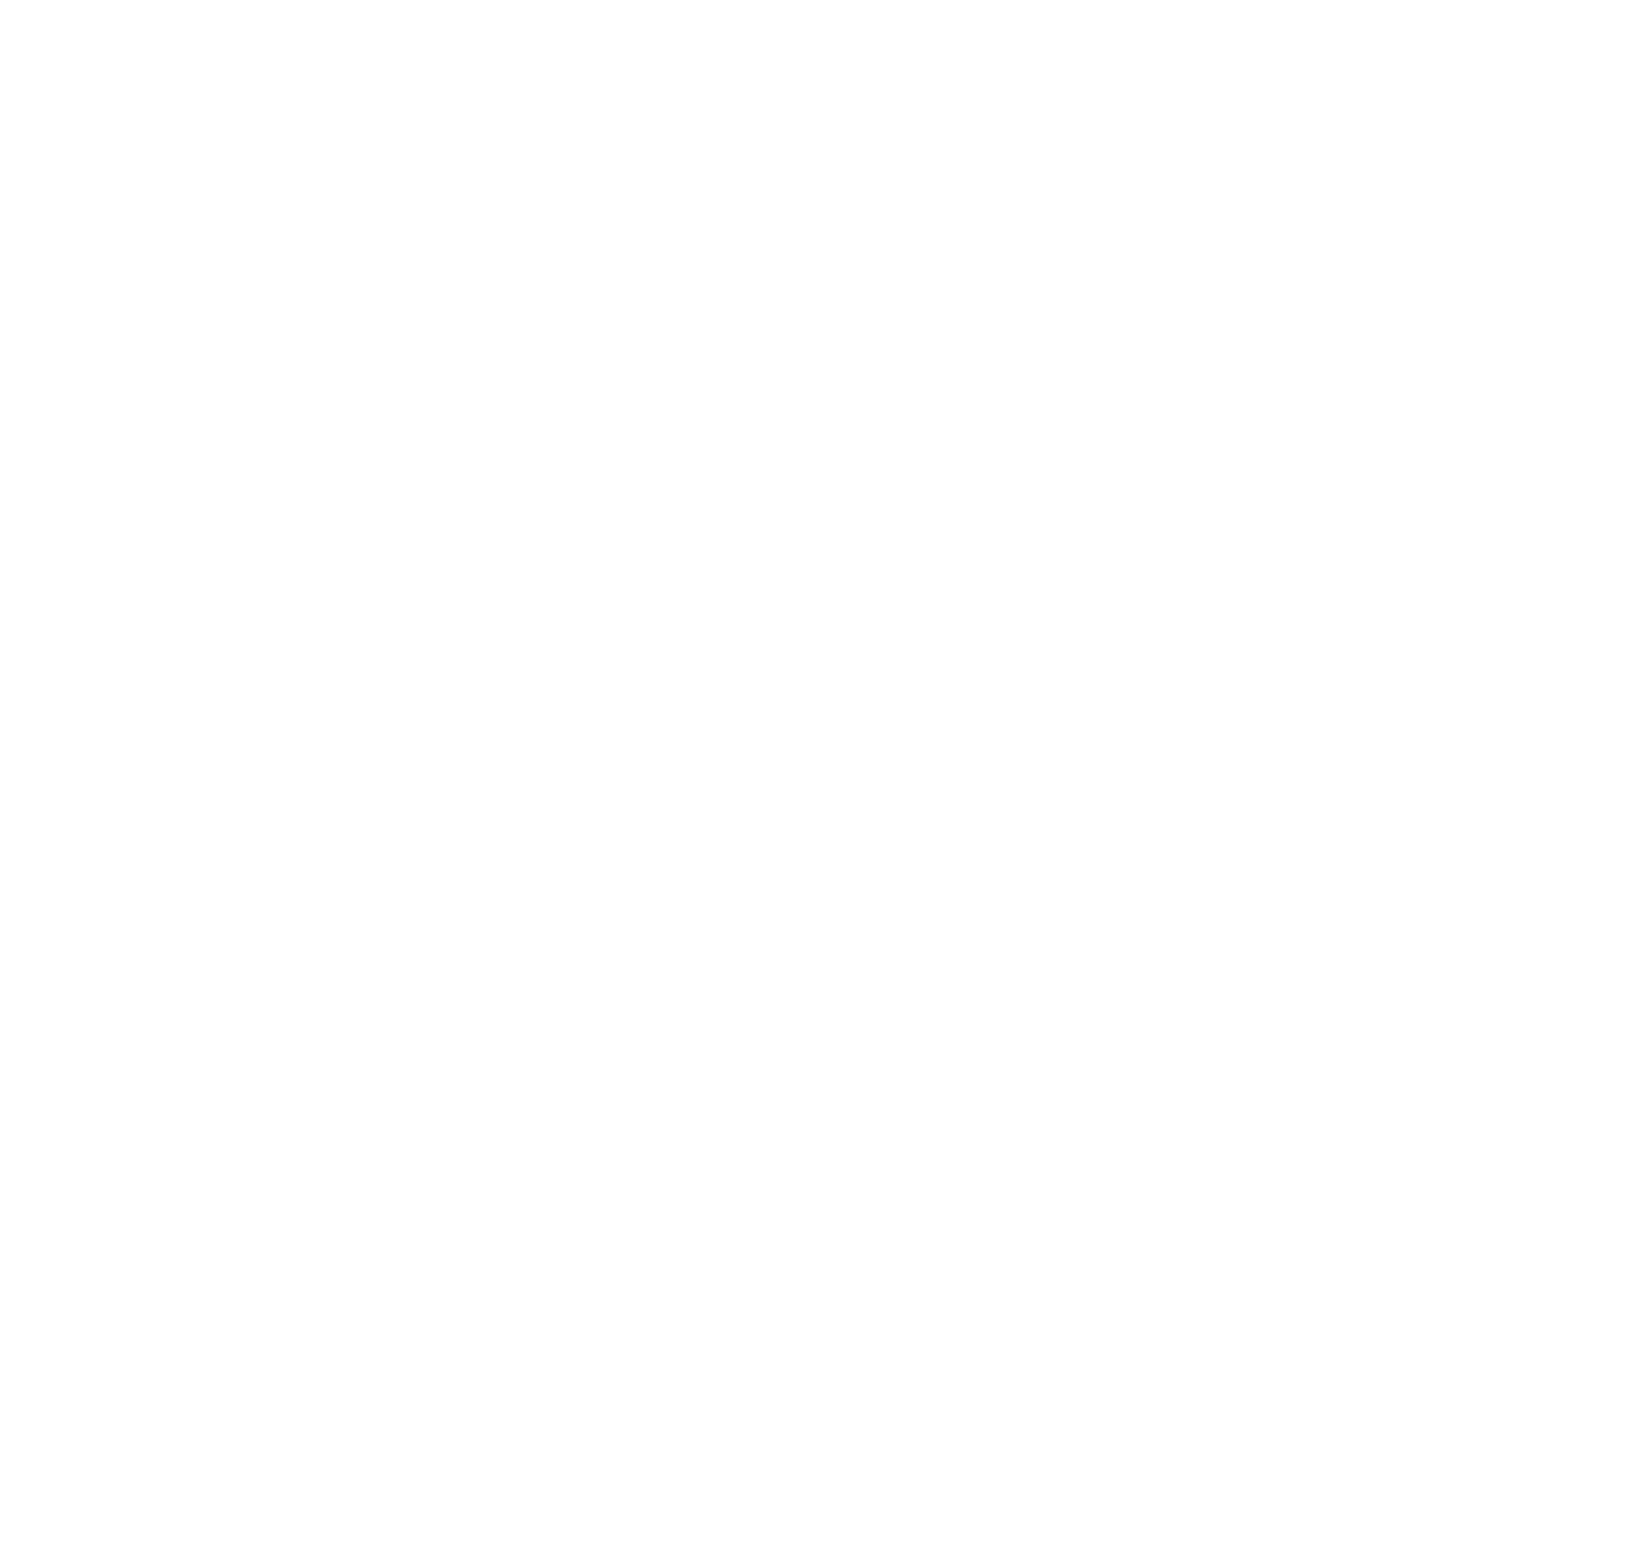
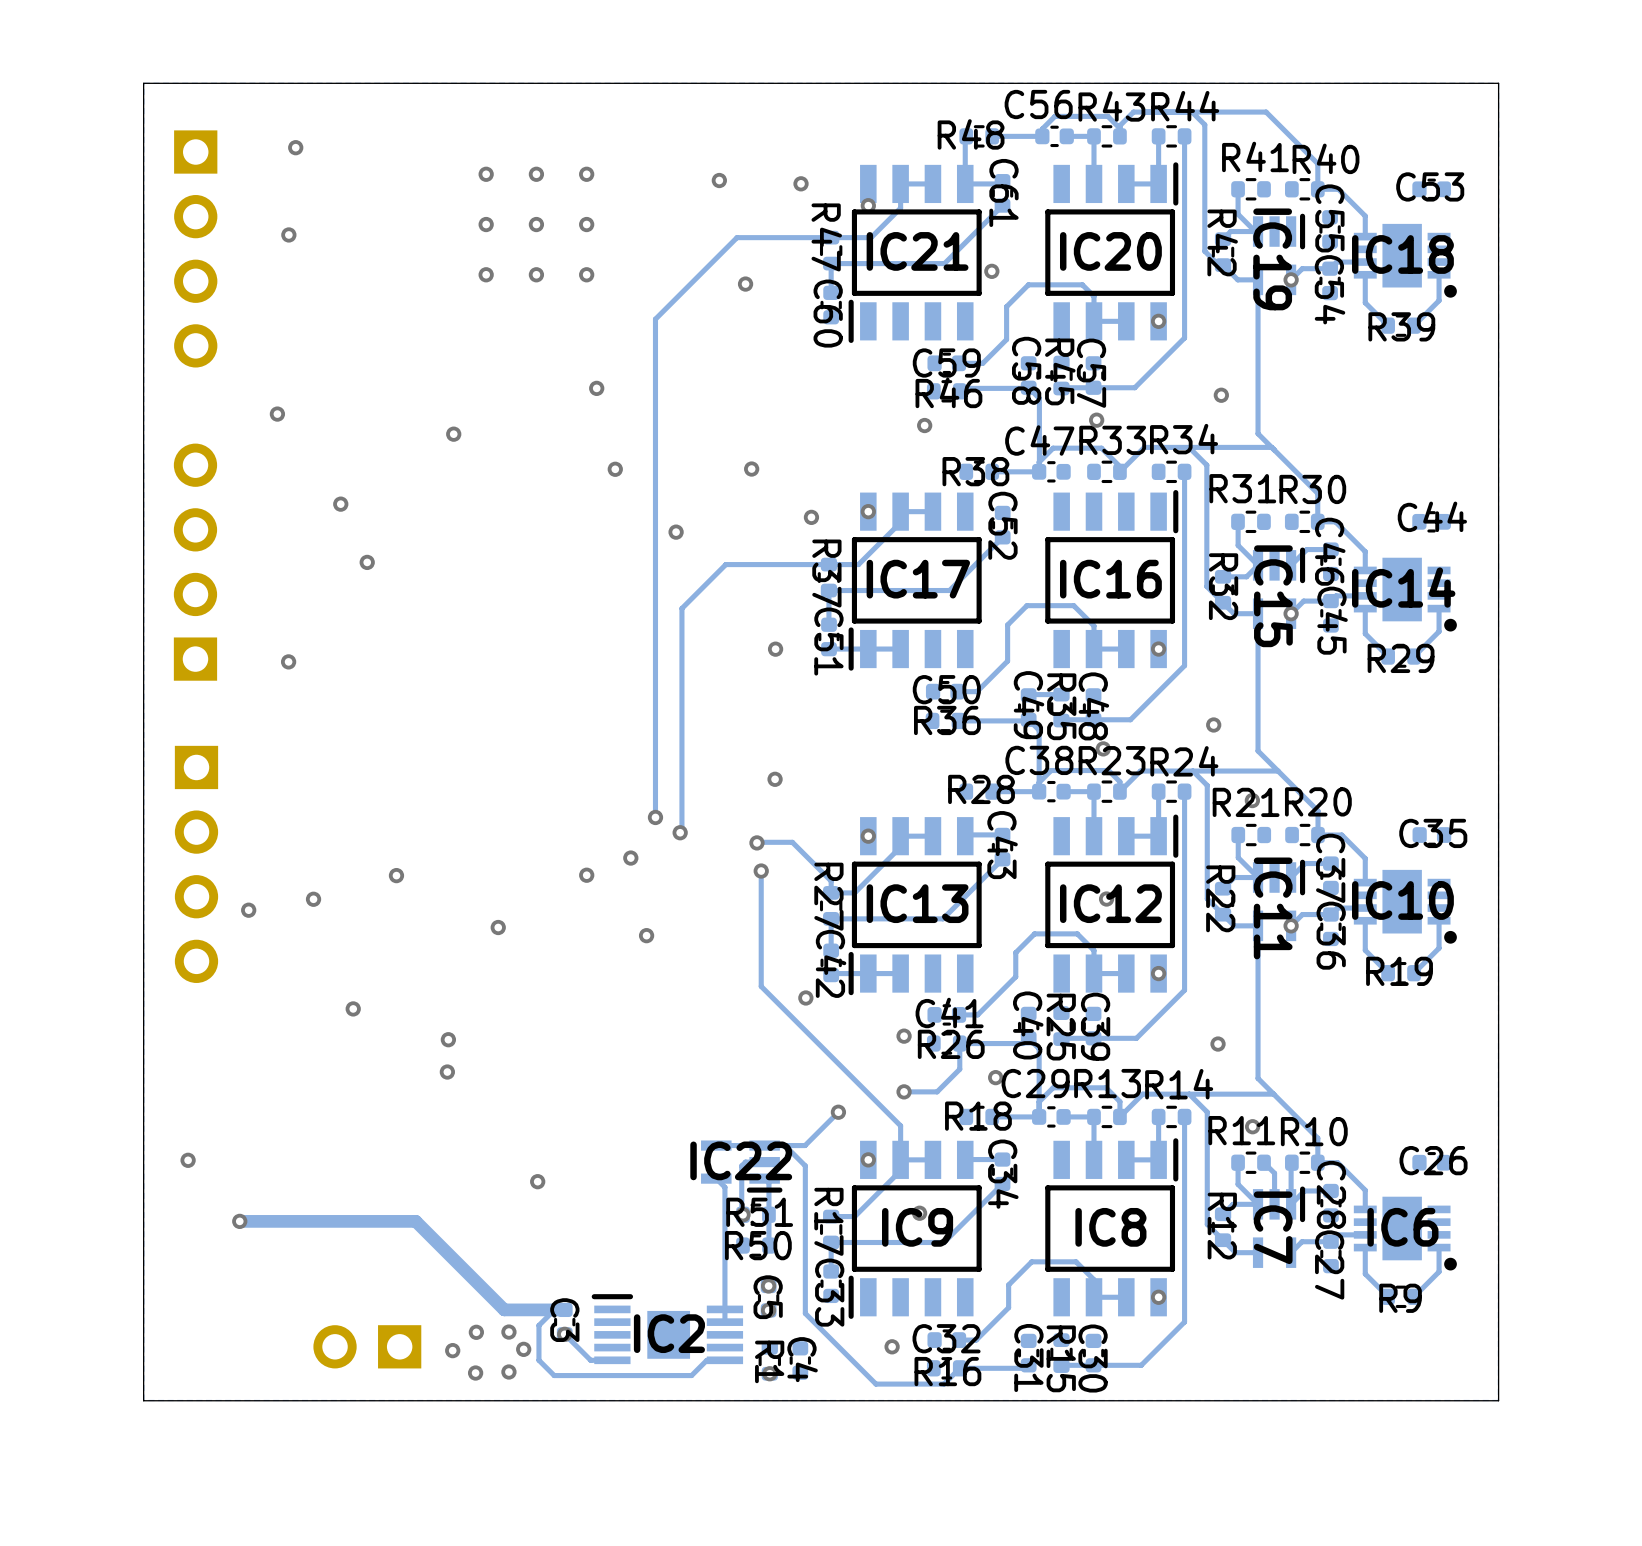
board edge: none -> (1498, 83) (143, 83) (143, 1400) (1498, 1400) (1498, 83)
track: none -> (1192, 112) (1204, 124) (1204, 251) (1237, 279) (1258, 279) (1258, 433) (1317, 493) (1317, 521) (1335, 521) (1365, 551) (1365, 570)
track: none -> (1119, 128) (1107, 116) (1054, 116) (1042, 128) (1042, 136) (992, 136)
track: none -> (966, 136) (965, 183) (999, 183) (1002, 181)
R48: none -> (979, 136)
C56: none -> (1054, 136)
track: none -> (1066, 136) (1093, 136) (1093, 183)
R43: none -> (1106, 136)
track: none -> (1119, 136) (1119, 125) (1133, 112) (1266, 112) (1317, 163) (1317, 189) (1338, 189) (1365, 216) (1365, 236)
track: none -> (1158, 136) (1158, 183) (1126, 183)
R44: none -> (1171, 136)
track: none -> (1184, 136) (1184, 338) (1134, 387) (1061, 388)
via: none -> (295, 147)
via: none -> (486, 174)
via: none -> (536, 174)
via: none -> (586, 174)
via: none -> (719, 180)
via: none -> (801, 183)
track: none -> (932, 183) (900, 183) (900, 208) (871, 237) (737, 237) (655, 319) (655, 817)
track: none -> (1238, 189) (1238, 214) (1255, 231)
R41: none -> (1251, 189)
R40: none -> (1304, 189)
C53: none -> (1431, 189)
C61: none -> (1002, 193)
via: none -> (868, 205)
track: none -> (1002, 205) (944, 263) (831, 263) (831, 292)
via: none -> (486, 224)
via: none -> (536, 224)
via: none -> (586, 224)
C55: none -> (1330, 229)
track: none -> (1258, 231) (1230, 231) (1223, 239)
via: none -> (288, 234)
part: none -> (195, 248)
R47: none -> (831, 250)
IC20: none -> (1111, 251)
R42: none -> (1223, 252)
IC21: none -> (915, 253)
IC19: none -> (1279, 254)
IC18: none -> (1405, 260)
track: none -> (1365, 262) (1336, 262) (1330, 268) (1302, 268) (1291, 279)
via: none -> (991, 271)
via: none -> (486, 274)
via: none -> (536, 274)
via: none -> (586, 274)
track: none -> (1365, 274) (1365, 302) (1388, 325)
track: none -> (1439, 274) (1439, 300) (1414, 325)
via: none -> (1291, 279)
C54: none -> (1330, 280)
via: none -> (745, 284)
C60: none -> (831, 305)
track: none -> (1126, 321) (1093, 321) (1093, 296) (1082, 284) (1028, 284) (1006, 306) (1006, 339) (982, 363) (959, 363)
via: none -> (1158, 321)
R39: none -> (1401, 325)
C59: none -> (946, 363)
C58: none -> (1028, 375)
R45: none -> (1061, 375)
C57: none -> (1093, 375)
via: none -> (596, 388)
R46: none -> (946, 391)
track: none -> (959, 391) (962, 388) (1028, 387) (1039, 398) (1039, 471)
via: none -> (1221, 395)
via: none -> (277, 414)
via: none -> (1096, 420)
via: none -> (924, 425)
via: none -> (453, 434)
track: none -> (1189, 447) (1206, 465) (1206, 586) (1233, 613) (1258, 613) (1258, 751) (1318, 810) (1318, 835) (1341, 835) (1365, 858) (1365, 882)
track: none -> (1271, 447) (1144, 447) (1119, 471) (1119, 466) (1101, 448) (1053, 448) (1039, 462) (1039, 471) (992, 471)
via: none -> (615, 469)
via: none -> (751, 469)
R38: none -> (979, 471)
C47: none -> (1051, 471)
R33: none -> (1106, 471)
R34: none -> (1171, 471)
track: none -> (1184, 471) (1184, 665) (1130, 719) (1061, 720)
via: none -> (340, 504)
via: none -> (868, 511)
track: none -> (932, 511) (900, 511) (900, 522) (858, 564) (725, 564) (681, 608) (681, 830) (680, 832)
via: none -> (811, 517)
track: none -> (1238, 521) (1238, 545) (1258, 565) (1246, 576) (1223, 576)
R31: none -> (1250, 521)
R30: none -> (1304, 521)
C44: none -> (1431, 521)
C52: none -> (1002, 525)
via: none -> (676, 532)
track: none -> (1002, 537) (949, 590) (828, 590) (829, 624)
track: none -> (1330, 549) (1306, 549) (1291, 565)
C46: none -> (1330, 561)
part: none -> (195, 562)
via: none -> (367, 562)
R37: none -> (828, 577)
IC16: none -> (1111, 579)
IC17: none -> (915, 581)
IC15: none -> (1279, 588)
R32: none -> (1223, 589)
IC14: none -> (1405, 594)
track: none -> (1365, 595) (1336, 595) (1330, 601) (1303, 601) (1291, 613)
track: none -> (1365, 608) (1365, 633) (1388, 656)
track: none -> (1439, 608) (1439, 631) (1414, 656)
via: none -> (1291, 613)
C45: none -> (1330, 613)
C51: none -> (829, 636)
via: none -> (775, 649)
track: none -> (900, 649) (829, 649)
track: none -> (1126, 649) (1093, 649) (1093, 625) (1073, 605) (1026, 605) (1007, 625) (1007, 661) (977, 691) (957, 691)
via: none -> (1158, 649)
R29: none -> (1401, 656)
via: none -> (288, 661)
C50: none -> (945, 691)
track: none -> (1061, 694) (1028, 695)
C49: none -> (1028, 707)
R35: none -> (1061, 707)
C48: none -> (1093, 707)
R36: none -> (945, 720)
track: none -> (958, 720) (1028, 719) (1039, 730) (1039, 791) (992, 791)
via: none -> (1213, 724)
via: none -> (1103, 748)
track: none -> (1192, 771) (1207, 785) (1207, 898) (1234, 925) (1258, 925) (1258, 1078) (1317, 1138) (1317, 1162) (1337, 1162) (1365, 1190) (1365, 1209)
track: none -> (1278, 771) (1140, 771) (1119, 791) (1119, 781) (1108, 770) (1051, 770) (1039, 782)
via: none -> (775, 779)
R28: none -> (979, 791)
C38: none -> (1051, 791)
track: none -> (1063, 791) (1093, 791) (1093, 836)
R23: none -> (1106, 791)
track: none -> (1158, 791) (1158, 836) (1126, 836)
R24: none -> (1171, 791)
track: none -> (1184, 791) (1184, 990) (1136, 1038) (1061, 1039)
via: none -> (1252, 800)
via: none -> (655, 817)
via: none -> (680, 832)
track: none -> (1002, 834) (965, 836)
track: none -> (1238, 835) (1238, 857) (1258, 877) (1234, 877) (1223, 888)
R21: none -> (1251, 835)
R20: none -> (1305, 835)
C35: none -> (1431, 835)
via: none -> (868, 836)
track: none -> (932, 836) (900, 836) (900, 846) (854, 892) (831, 892) (831, 881) (792, 842) (756, 842)
via: none -> (756, 842)
C43: none -> (1002, 847)
via: none -> (630, 858)
track: none -> (1002, 859) (942, 918) (831, 918) (831, 950)
track: none -> (1330, 863) (1305, 863) (1291, 877)
part: none -> (196, 864)
track: none -> (761, 871) (761, 986) (900, 1125) (900, 1170) (854, 1216) (831, 1216)
via: none -> (761, 871)
via: none -> (396, 875)
via: none -> (586, 875)
C37: none -> (1330, 875)
via: none -> (313, 899)
via: none -> (1106, 899)
IC11: none -> (1279, 900)
R22: none -> (1223, 901)
IC12: none -> (1111, 903)
R27: none -> (831, 905)
IC13: none -> (915, 906)
IC10: none -> (1405, 906)
track: none -> (1365, 908) (1337, 908) (1330, 914) (1302, 914) (1291, 925)
via: none -> (248, 910)
track: none -> (1365, 920) (1365, 950) (1388, 973)
track: none -> (1439, 920) (1439, 948) (1414, 973)
via: none -> (1291, 925)
C36: none -> (1330, 926)
via: none -> (498, 927)
via: none -> (646, 935)
C42: none -> (831, 962)
track: none -> (900, 973) (831, 975)
track: none -> (1126, 973) (1093, 973) (1093, 950) (1077, 933) (1034, 933) (1015, 952) (1015, 976) (977, 1014) (959, 1014)
via: none -> (1158, 973)
R19: none -> (1401, 973)
via: none -> (805, 997)
via: none -> (353, 1008)
C41: none -> (946, 1014)
C40: none -> (1028, 1026)
R25: none -> (1061, 1026)
C39: none -> (1093, 1026)
via: none -> (904, 1036)
via: none -> (448, 1039)
R26: none -> (946, 1043)
via: none -> (1218, 1044)
via: none -> (447, 1072)
via: none -> (995, 1077)
track: none -> (904, 1091) (937, 1091) (959, 1069) (959, 1043) (1023, 1043) (1028, 1038) (1039, 1048) (1039, 1116) (992, 1116)
via: none -> (904, 1091)
track: none -> (1189, 1094) (1207, 1112) (1207, 1224) (1235, 1252) (1258, 1252)
track: none -> (1273, 1094) (1142, 1094) (1119, 1116) (1119, 1101) (1106, 1087) (1053, 1087) (1039, 1101)
track: none -> (838, 1112) (805, 1145) (716, 1145)
via: none -> (838, 1112)
R18: none -> (979, 1116)
C29: none -> (1051, 1116)
track: none -> (1063, 1116) (1093, 1116) (1093, 1159)
R13: none -> (1106, 1116)
track: none -> (1158, 1116) (1158, 1159) (1126, 1159)
R14: none -> (1171, 1116)
track: none -> (1184, 1116) (1184, 1322) (1141, 1365) (1061, 1366)
via: none -> (1252, 1126)
track: none -> (784, 1145) (805, 1165) (805, 1313) (875, 1384) (944, 1384) (959, 1368) (1025, 1368) (1028, 1365)
via: none -> (868, 1159)
track: none -> (932, 1159) (900, 1159)
track: none -> (1002, 1159) (965, 1159)
via: none -> (188, 1160)
track: none -> (764, 1162) (745, 1162) (741, 1165) (743, 1214)
track: none -> (1238, 1162) (1238, 1184) (1258, 1204) (1232, 1204) (1223, 1214)
R11: none -> (1251, 1162)
track: none -> (1264, 1162) (1274, 1173) (1274, 1204)
track: none -> (1291, 1162) (1291, 1204) (1304, 1190) (1330, 1190)
R10: none -> (1304, 1162)
C26: none -> (1431, 1162)
IC22: none -> (741, 1166)
C34: none -> (1002, 1171)
track: none -> (716, 1178) (724, 1187) (724, 1322)
track: none -> (764, 1178) (768, 1182) (768, 1245)
via: none -> (537, 1181)
track: none -> (1002, 1183) (944, 1242) (831, 1242) (831, 1271)
C28: none -> (1330, 1203)
via: none -> (919, 1213)
via: none -> (743, 1214)
R51: none -> (755, 1214)
track: none -> (239, 1221) (415, 1221) (504, 1309) (564, 1309)
via: none -> (239, 1221)
IC8: none -> (1111, 1227)
R12: none -> (1223, 1227)
IC7: none -> (1279, 1227)
R17: none -> (831, 1229)
IC9: none -> (915, 1229)
IC6: none -> (1405, 1233)
track: none -> (1365, 1234) (1337, 1234) (1330, 1241) (1302, 1241) (1291, 1252)
R50: none -> (755, 1245)
track: none -> (1365, 1247) (1365, 1273) (1388, 1296)
track: none -> (1439, 1247) (1439, 1271) (1414, 1296)
C27: none -> (1330, 1253)
C33: none -> (831, 1283)
via: none -> (768, 1286)
R9: none -> (1401, 1296)
track: none -> (1126, 1297) (1093, 1297) (1093, 1279) (1076, 1261) (1031, 1261) (1008, 1284) (1008, 1307) (976, 1340) (959, 1340)
via: none -> (1158, 1297)
C5: none -> (768, 1298)
track: none -> (564, 1309) (554, 1309) (538, 1325) (538, 1360) (554, 1375) (691, 1375) (706, 1360) (724, 1360)
via: none -> (768, 1310)
C3: none -> (564, 1322)
IC2: none -> (667, 1329)
via: none -> (476, 1332)
via: none -> (508, 1332)
track: none -> (564, 1334) (590, 1360) (612, 1360)
via: none -> (564, 1334)
C32: none -> (946, 1340)
part: none -> (367, 1346)
via: none -> (892, 1346)
via: none -> (523, 1349)
via: none -> (452, 1350)
C31: none -> (1028, 1353)
R15: none -> (1061, 1353)
C30: none -> (1093, 1353)
R1: none -> (769, 1360)
C4: none -> (800, 1360)
R16: none -> (946, 1368)
via: none -> (508, 1372)
via: none -> (475, 1373)
via: none -> (769, 1373)

